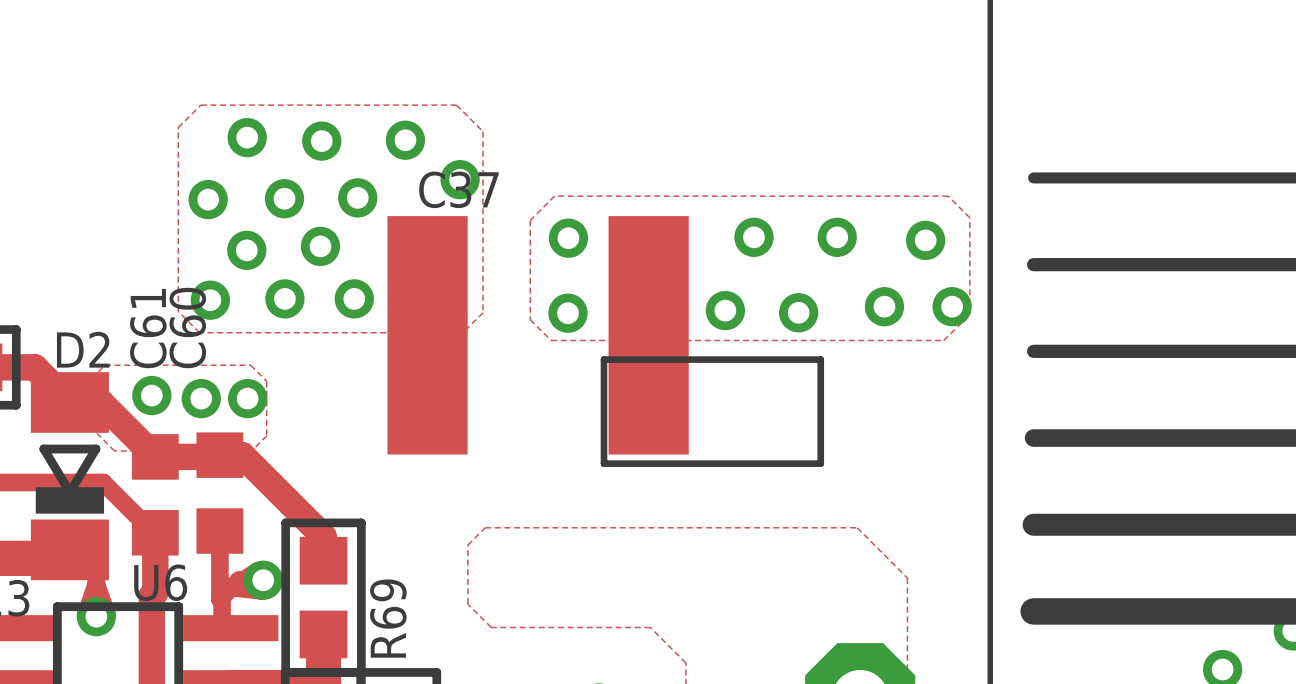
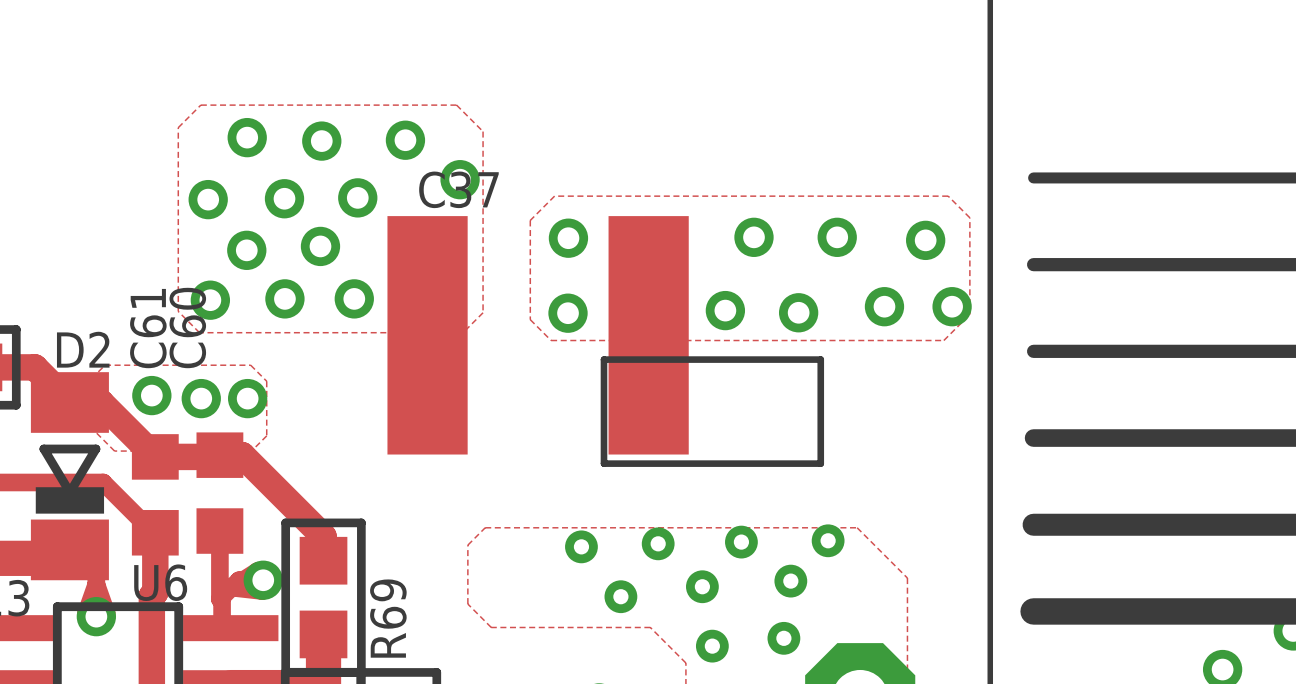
via: none -> (828, 540)
via: none -> (741, 542)
via: none -> (658, 543)
via: none -> (581, 546)
via: none -> (790, 581)
via: none -> (702, 586)
via: none -> (620, 596)
via: none -> (783, 638)
via: none -> (712, 646)

